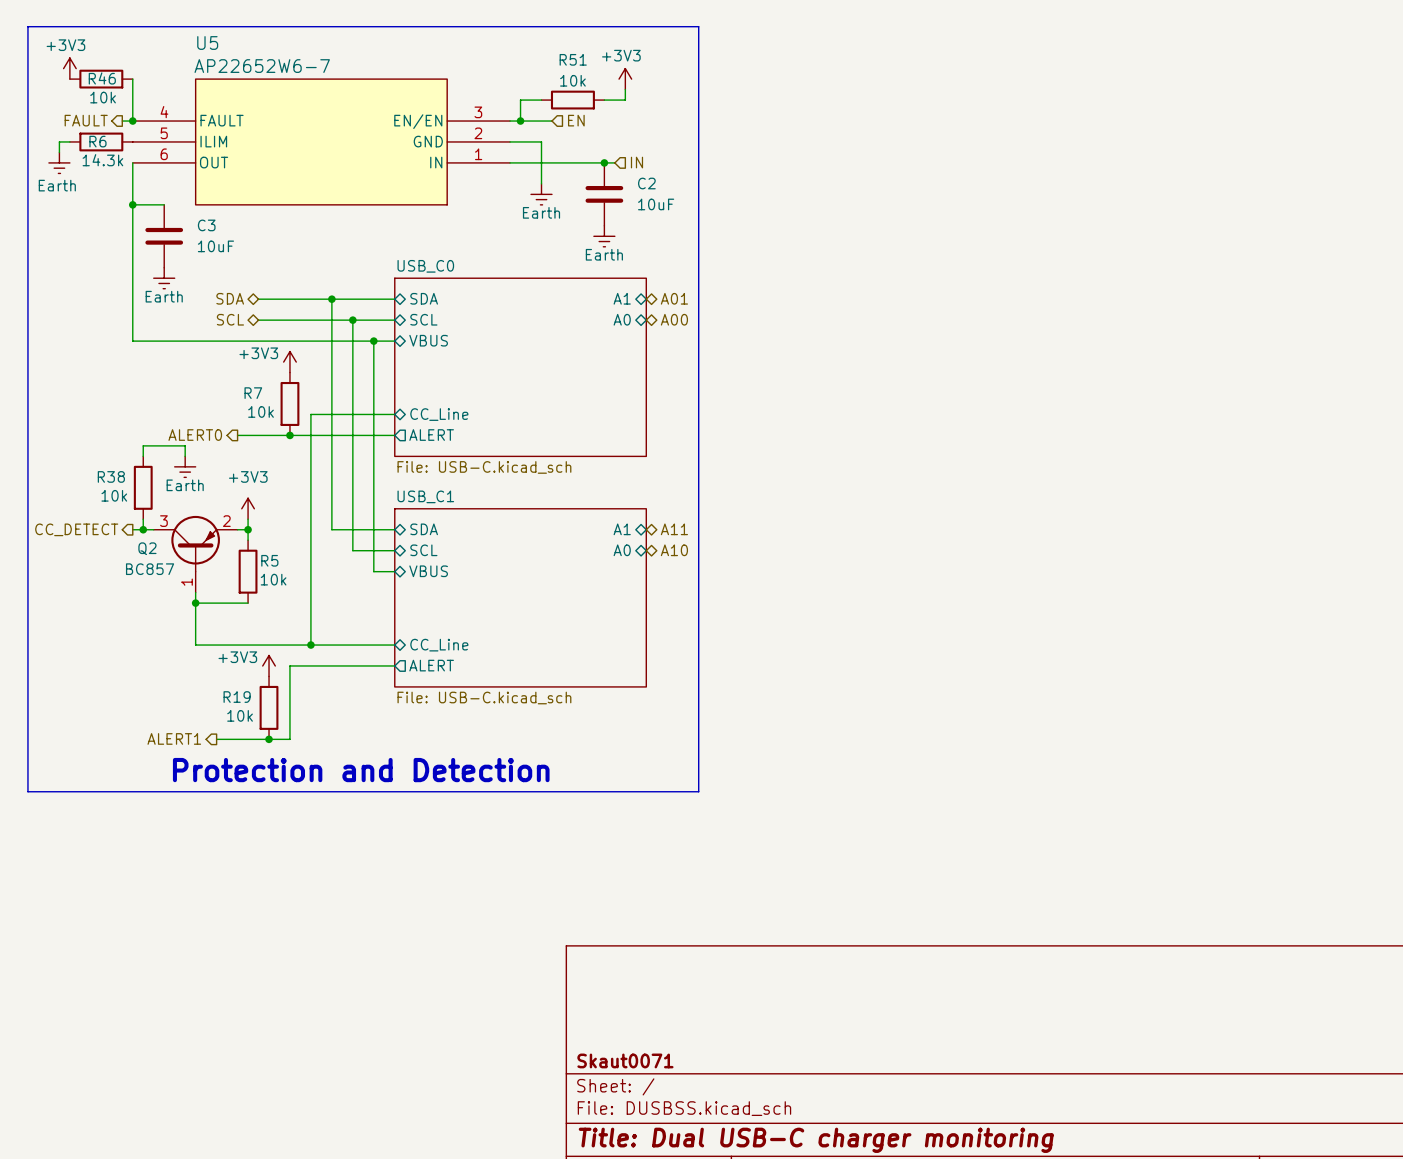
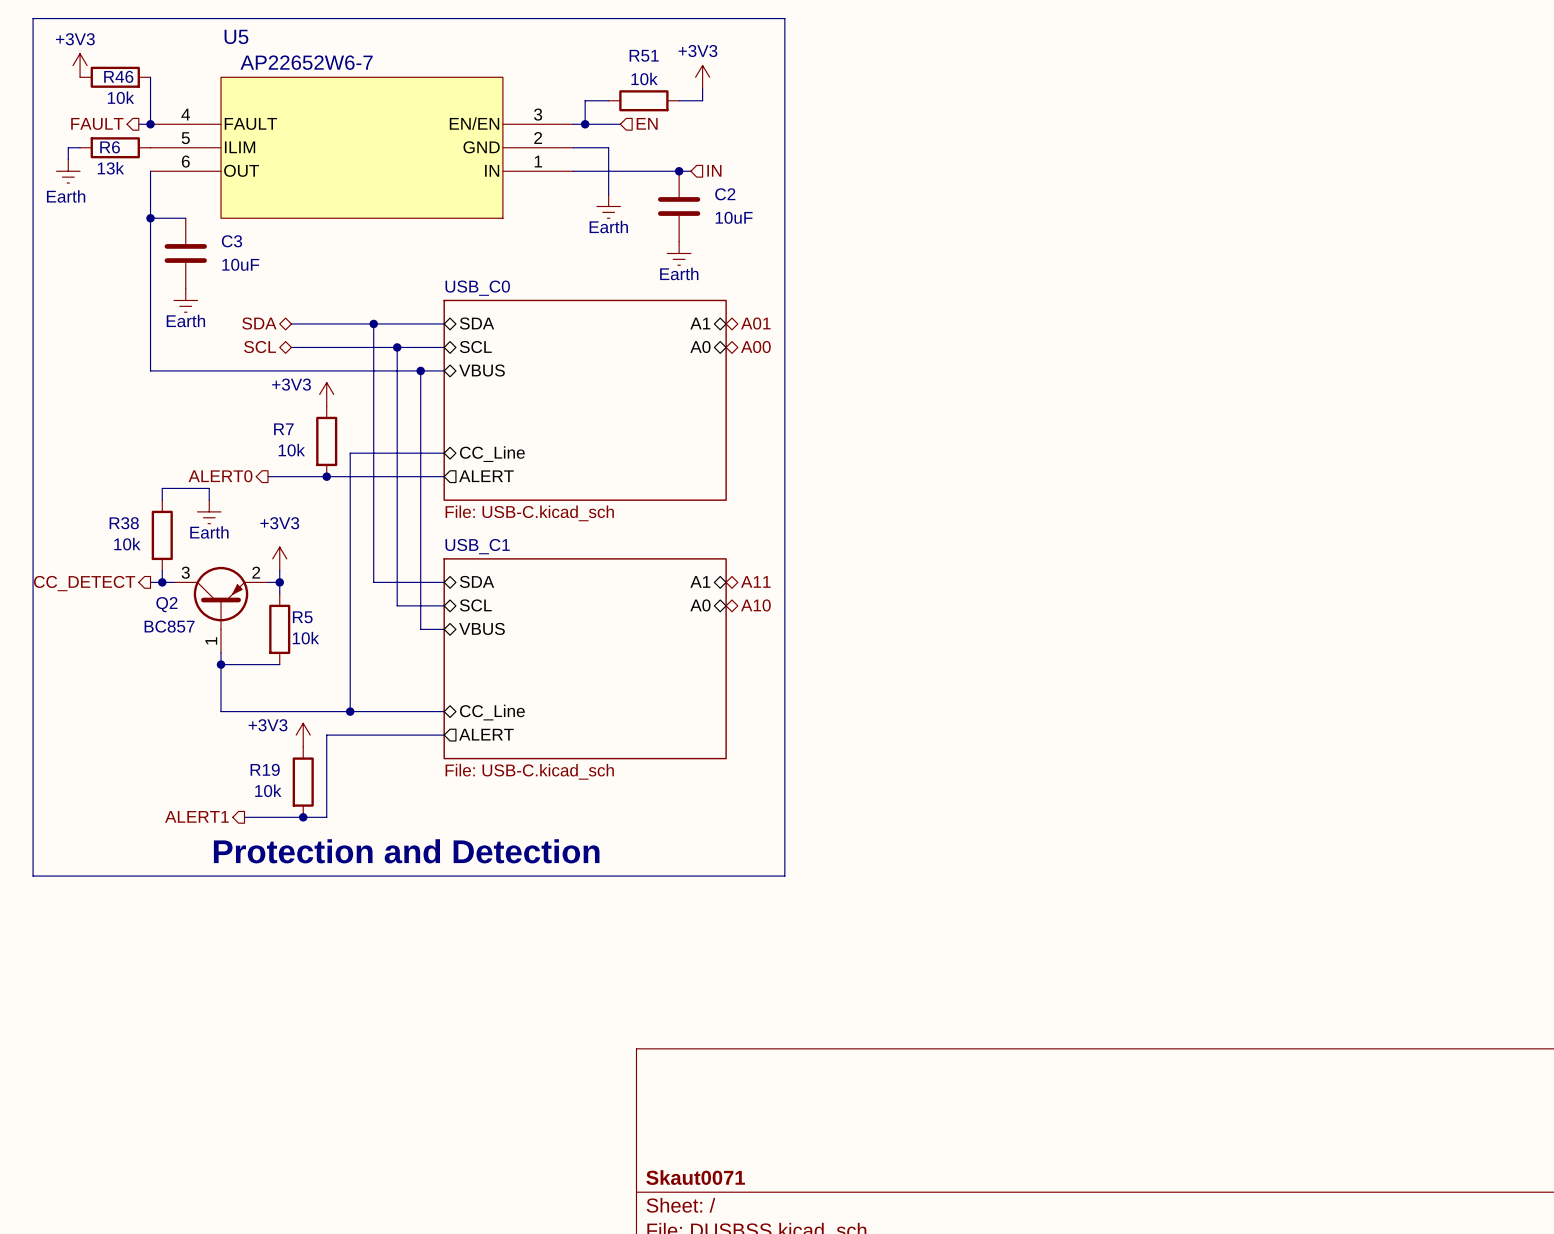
R6 value: 14.3k (102, 160) -> 13k (110, 168)

